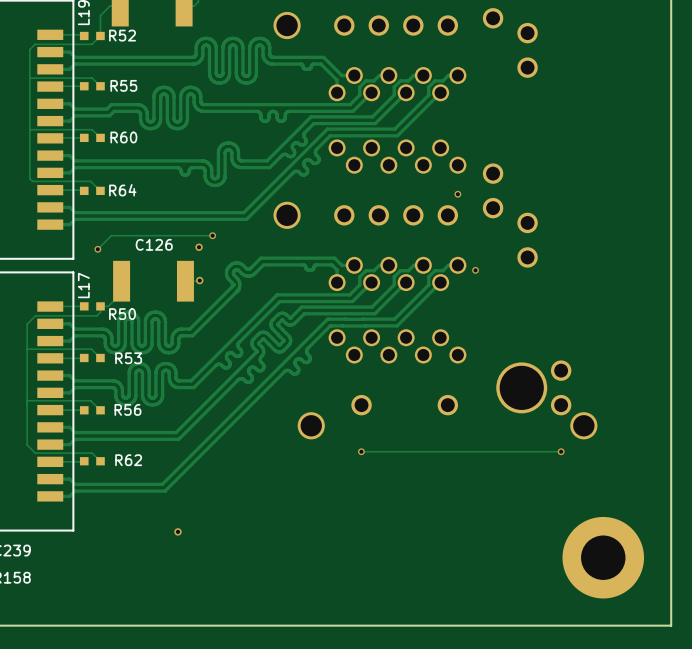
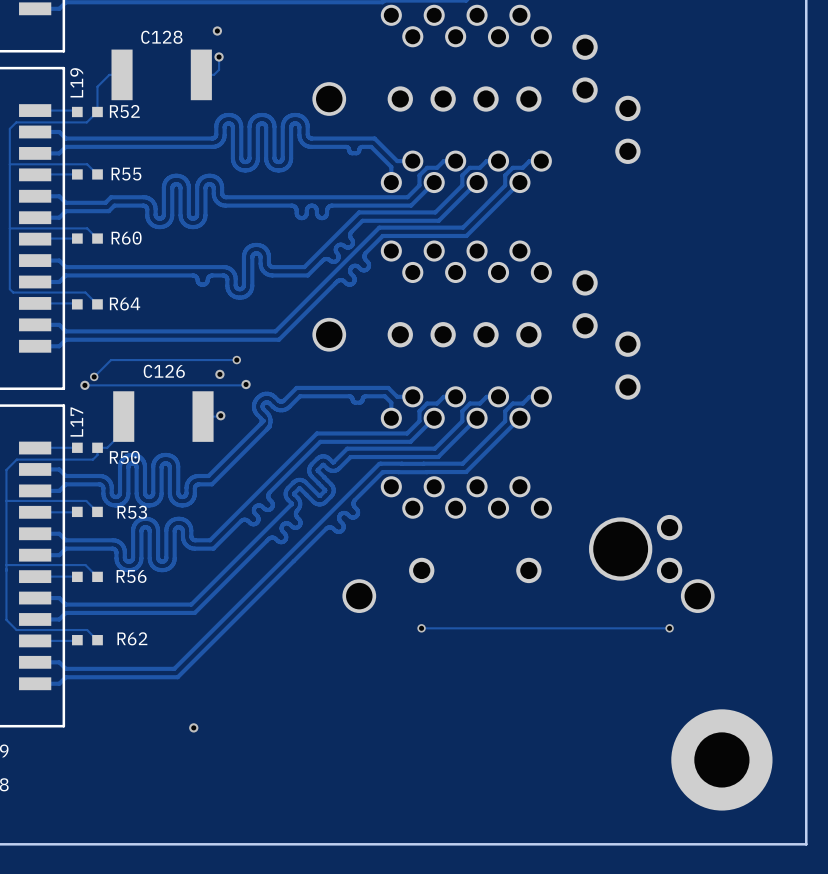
via: (457, 194) -> none
track: none -> (246, 384) (84, 385)
via: none -> (246, 384)
via: none -> (84, 385)
via: (475, 270) -> none

